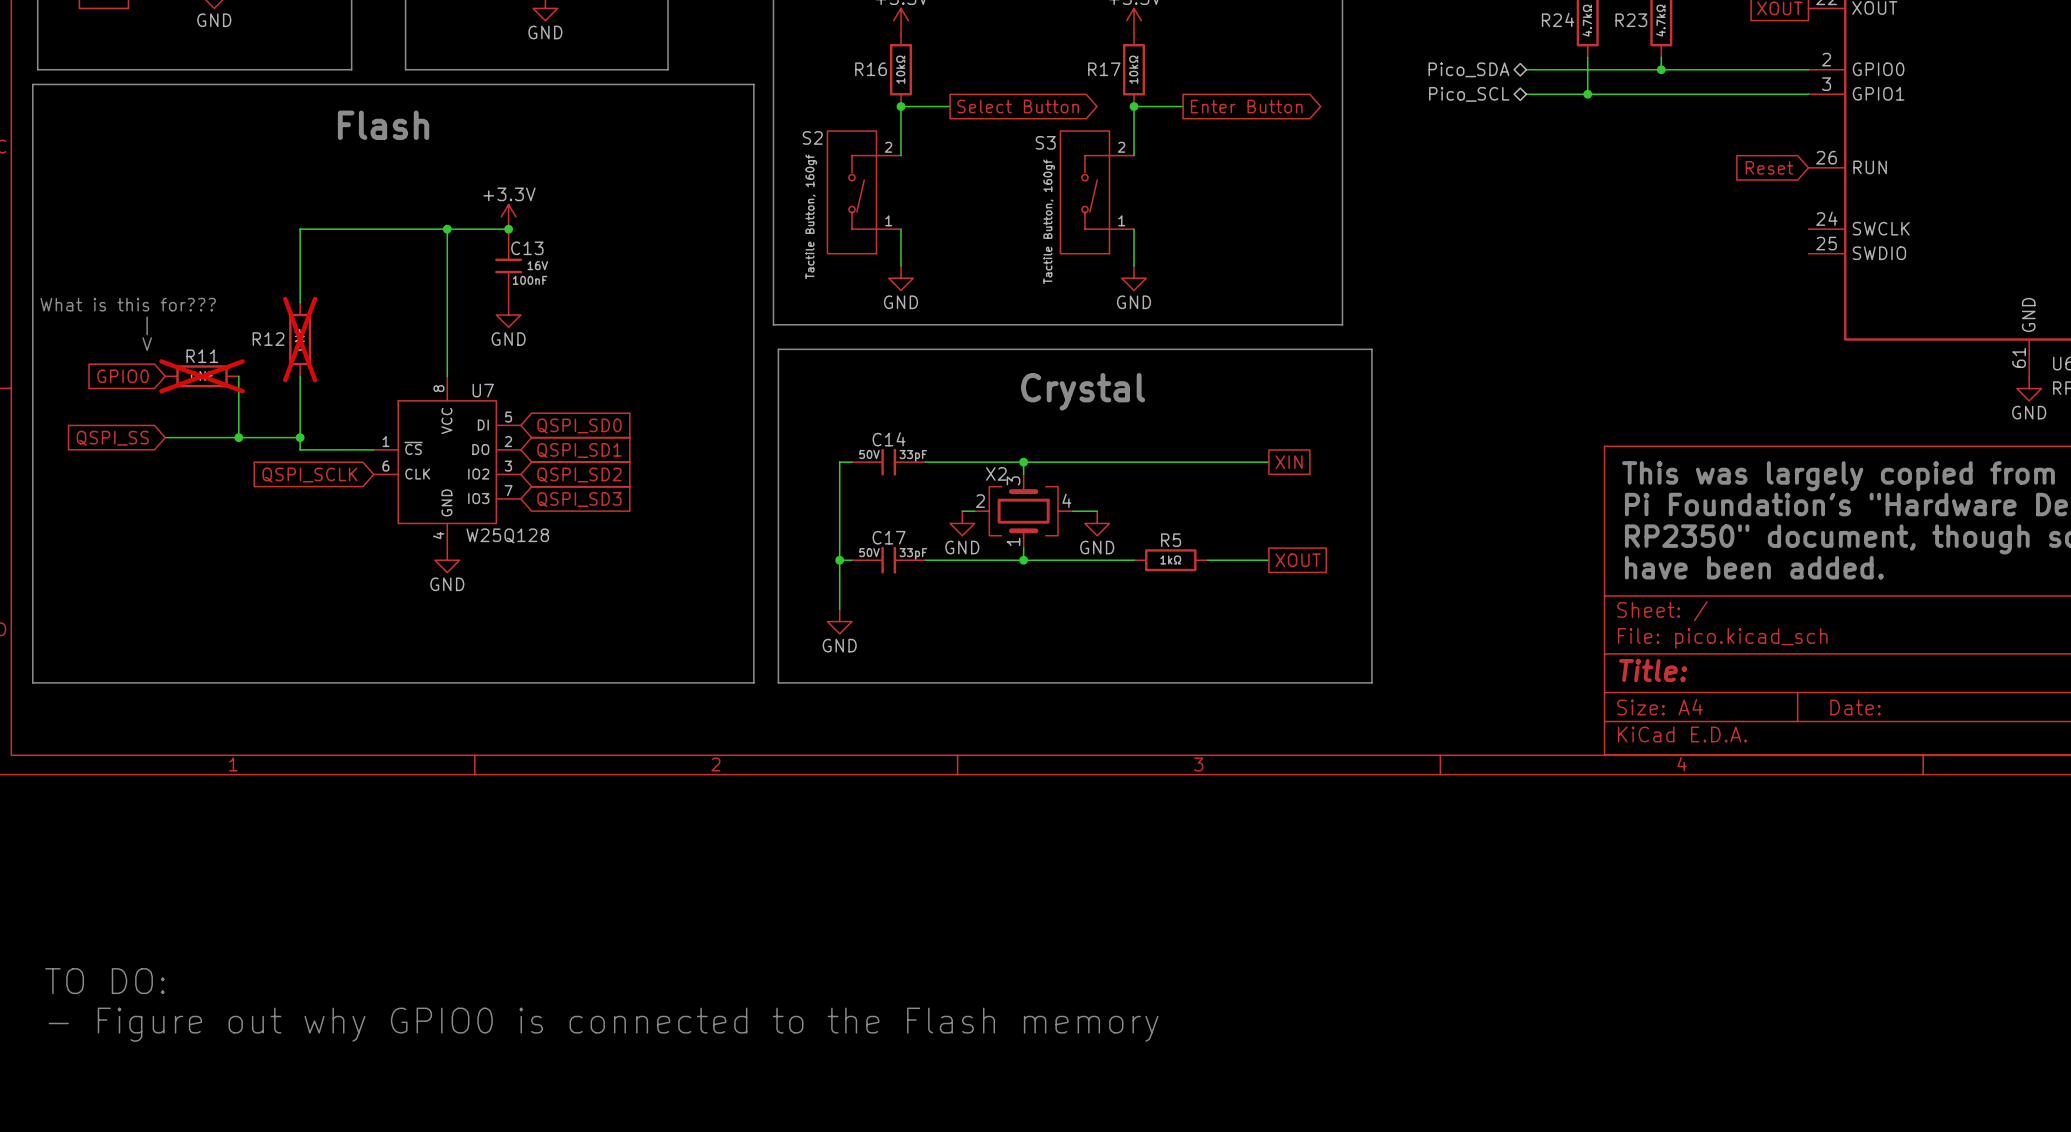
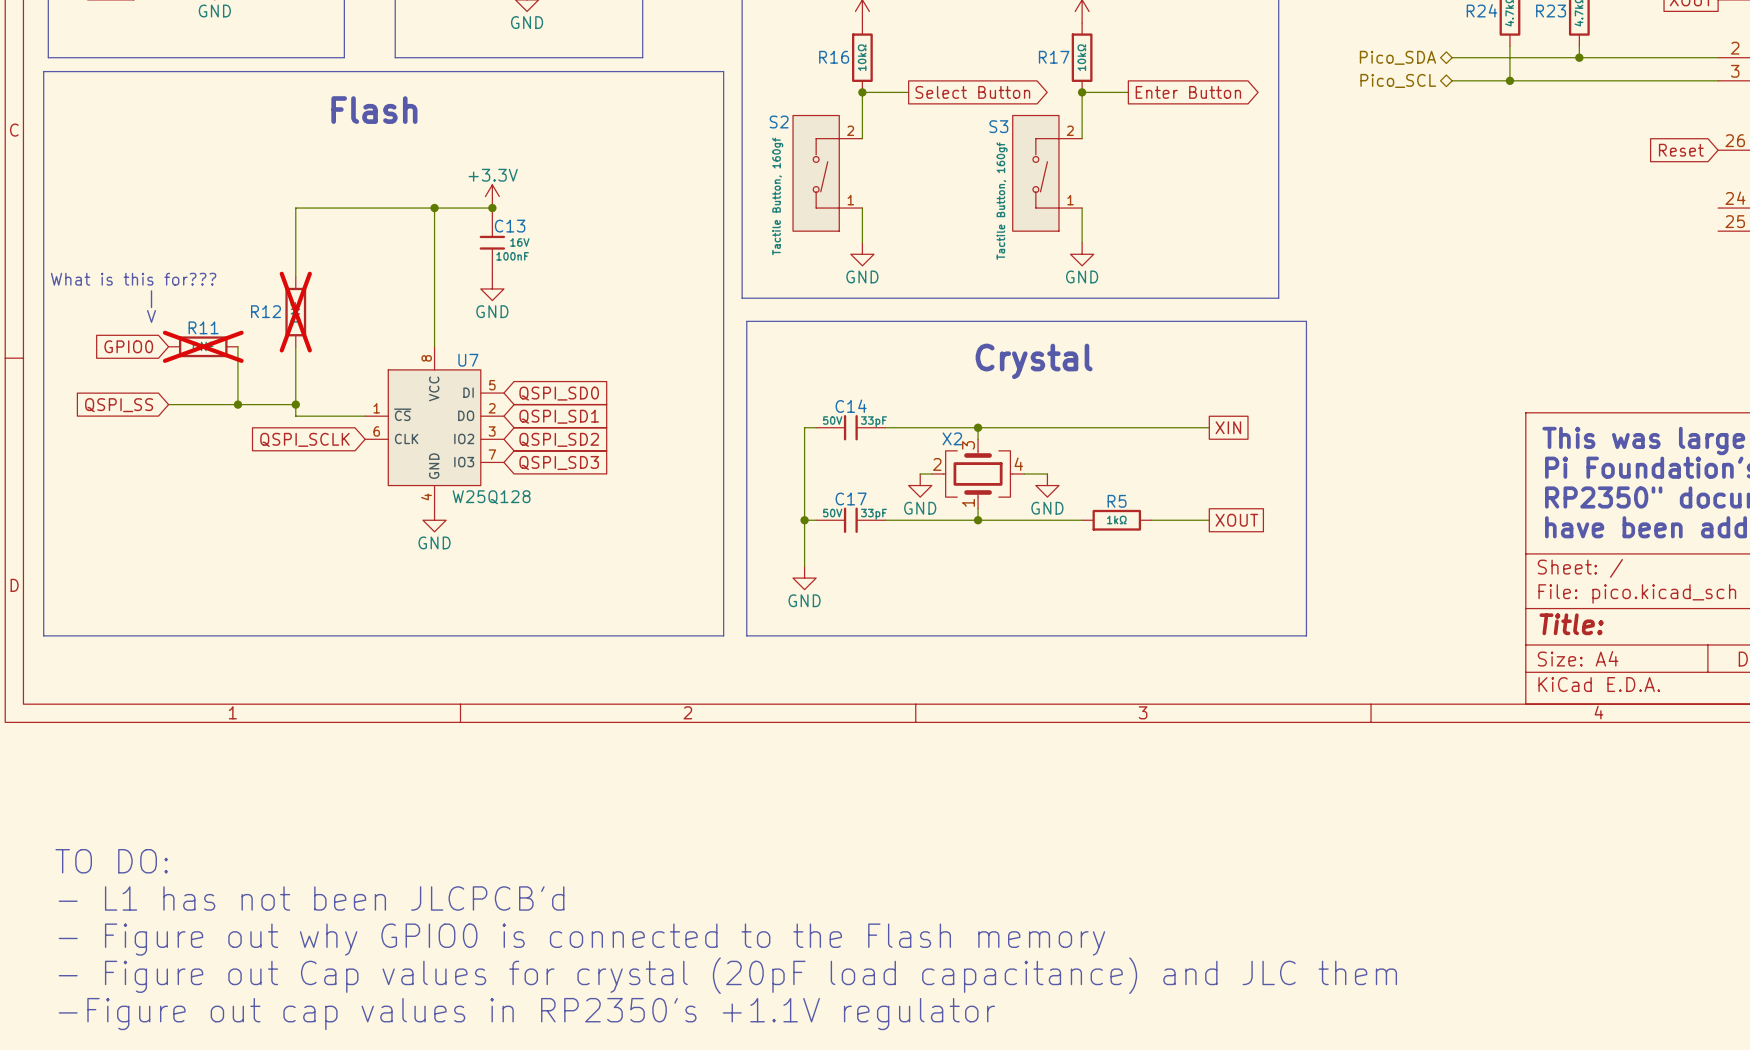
text: none -> - L1 has not been JLCPCB'd (311, 898)
text position: TO DO: (104, 981) -> TO DO: (111, 861)
text position: - Figure out why GPIO0 is connected to the Flash memory (603, 1024) -> - Figure out why GPIO0 is connected to the Flash memory (581, 939)
text: none -> - Figure out Cap values for crystal (20pF load capacitance) and JLC them (727, 975)
text: none -> -Figure out cap values in RP2350's +1.1V regulator (526, 1014)

